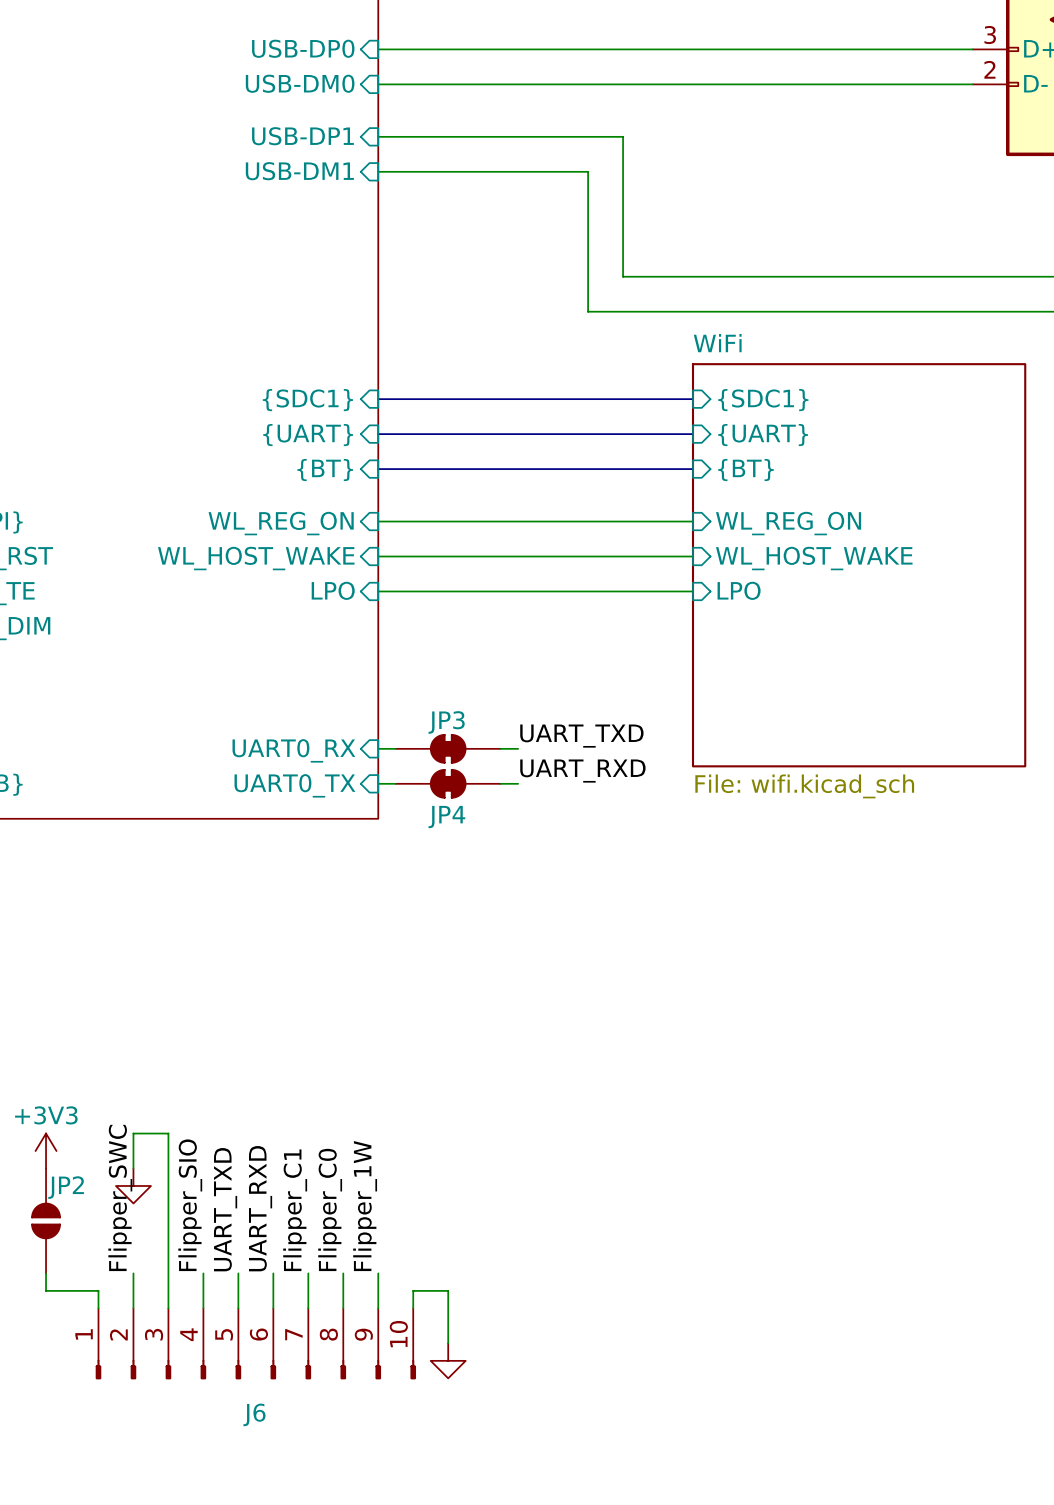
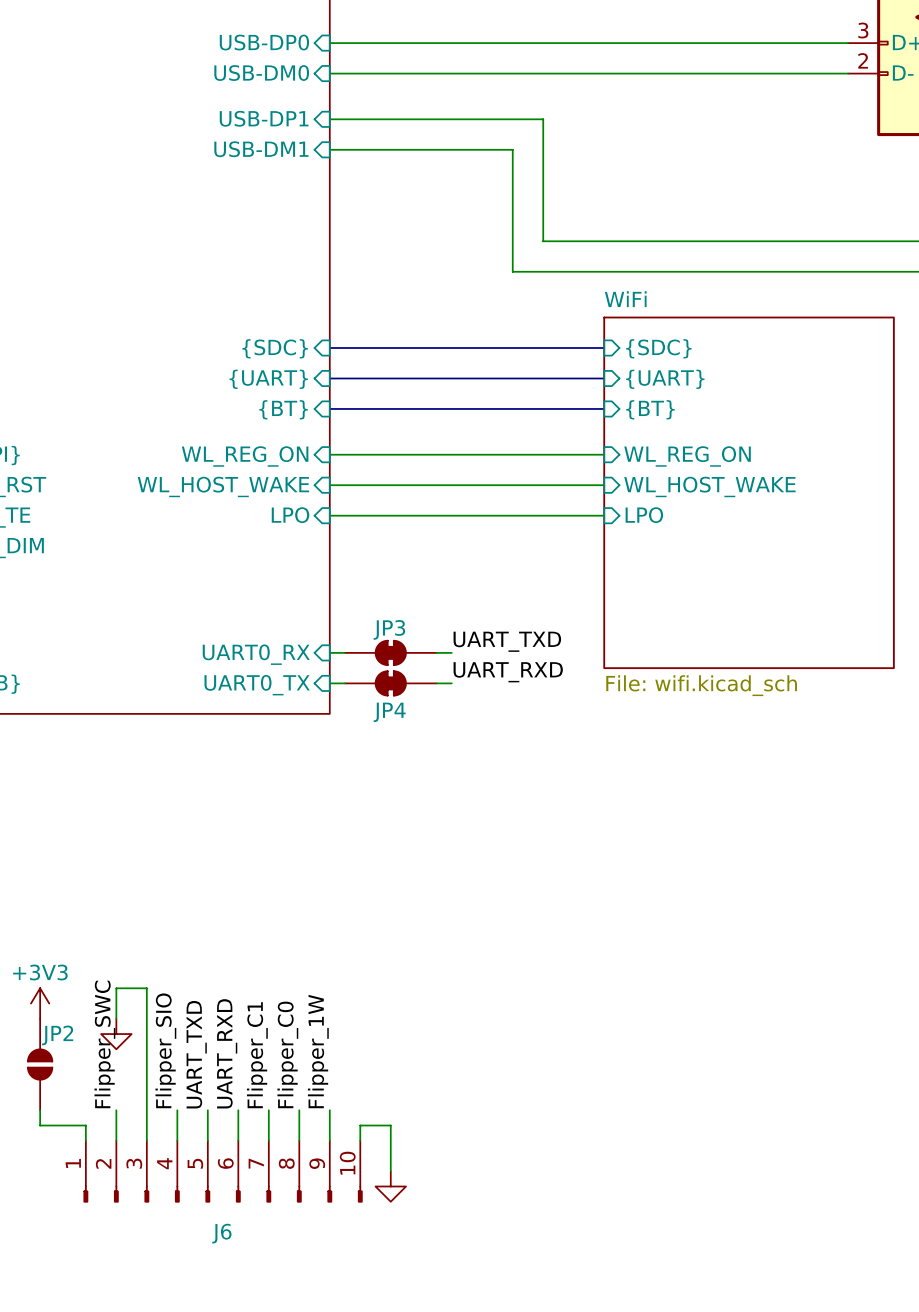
sheet pin: {SDC1} (307, 400) -> {SDC} (275, 348)
sheet pin: {SDC1} (763, 400) -> {SDC} (658, 348)

